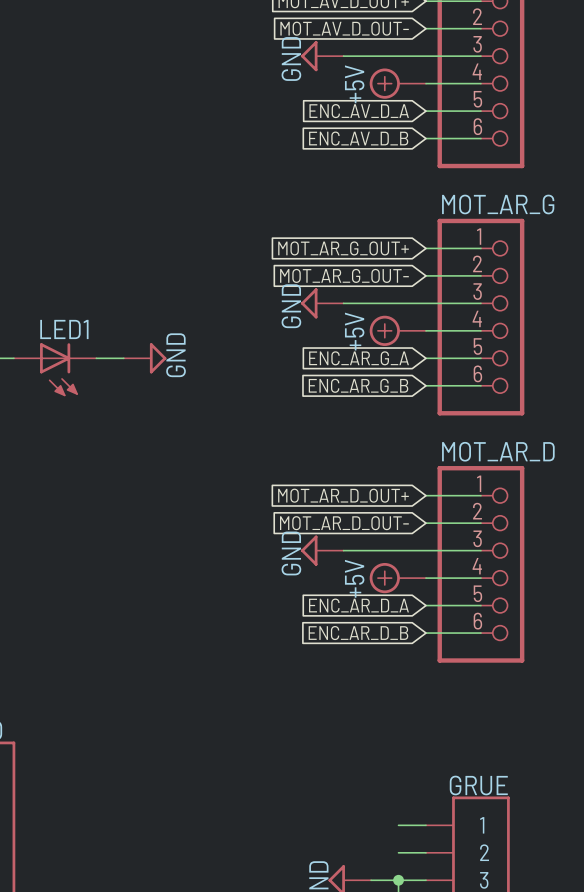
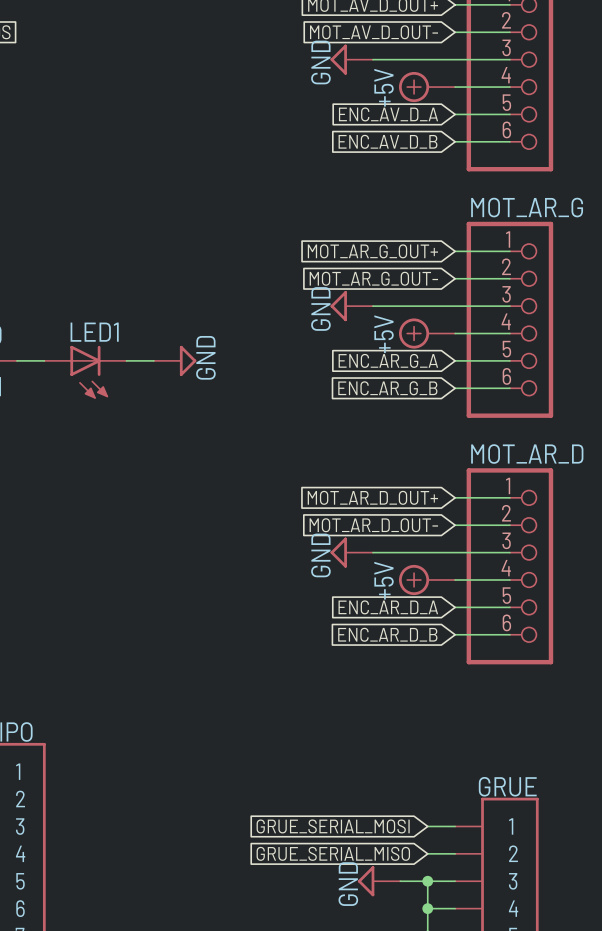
global label: none -> GRUE_SERIAL_MOSI (333, 826)
global label: none -> GRUE_SERIAL_MISO (333, 853)

